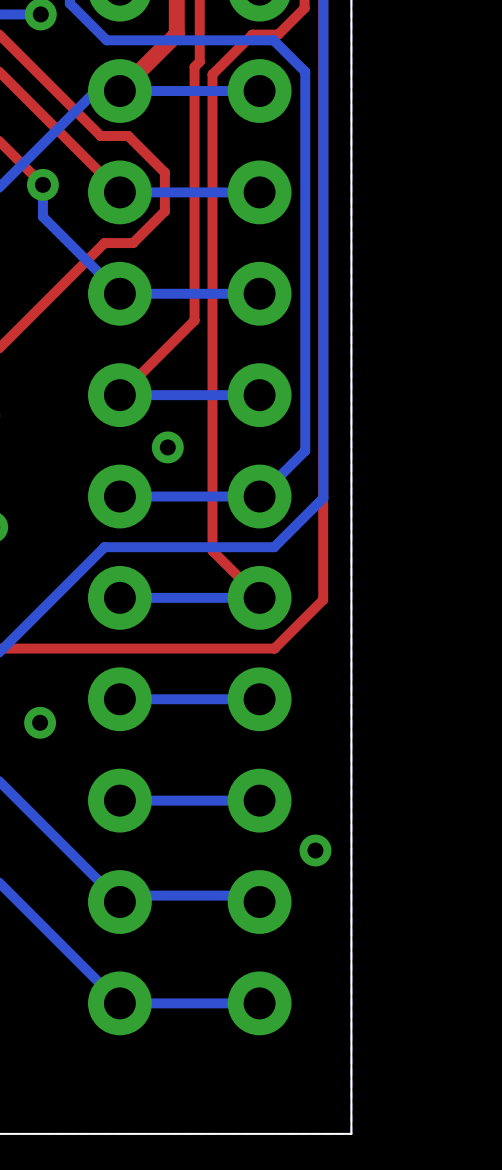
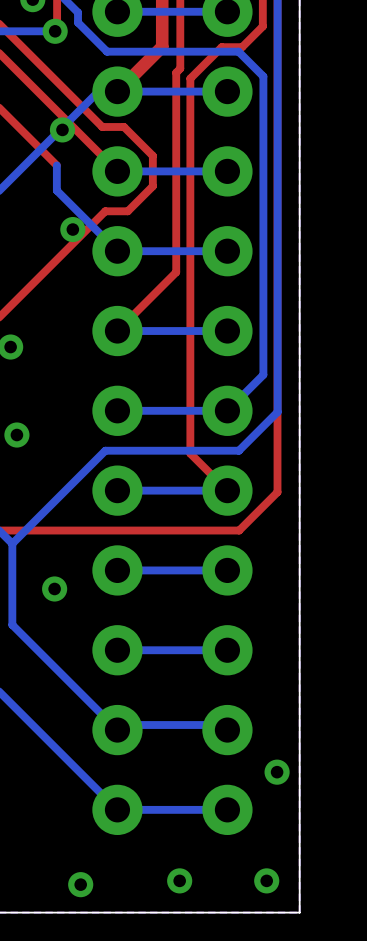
via: none -> (62, 129)
via: (42, 184) -> none
via: none -> (72, 229)
via: (167, 447) -> none
via position: (315, 850) -> (277, 772)
via: none -> (179, 880)
via: none -> (266, 880)
via: none -> (80, 884)

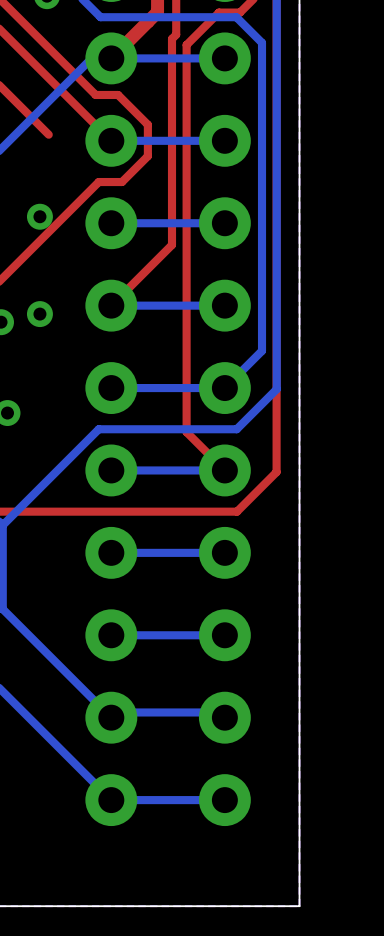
via: (62, 129) -> none
bottom track: (56, 165) (56, 190) (117, 251) -> none
via position: (72, 229) -> (39, 216)
via: none -> (39, 314)
via: (54, 588) -> none
via: (277, 772) -> none
via: (179, 880) -> none
via: (266, 880) -> none
via: (80, 884) -> none

